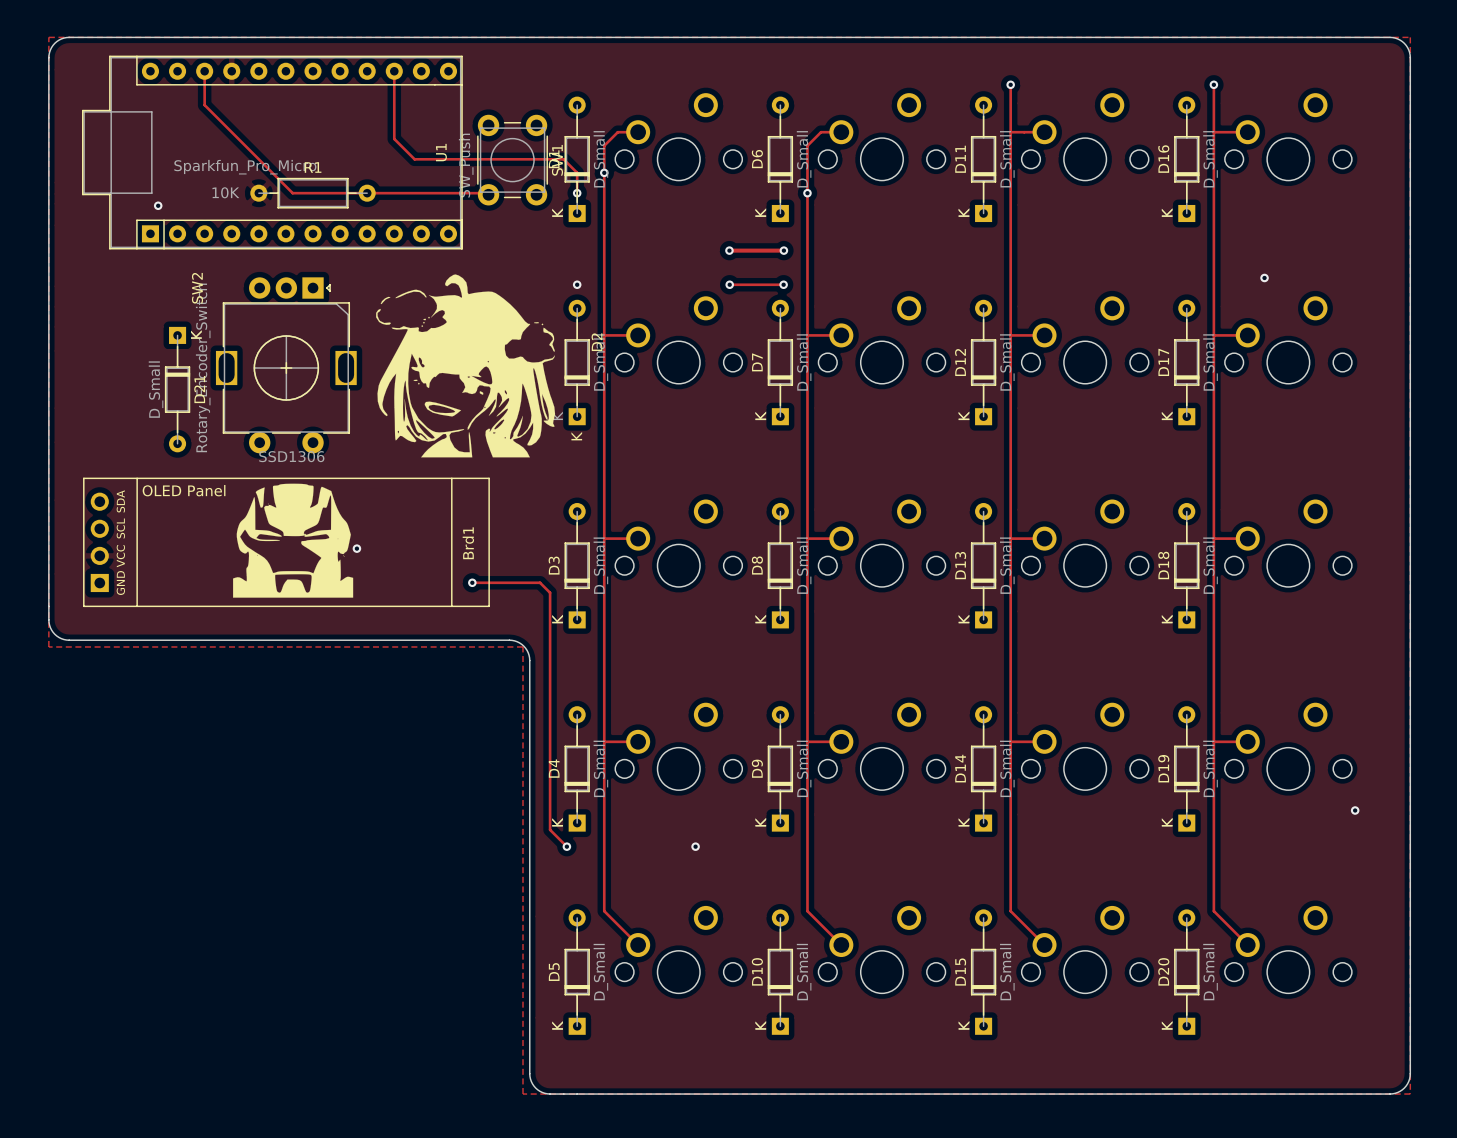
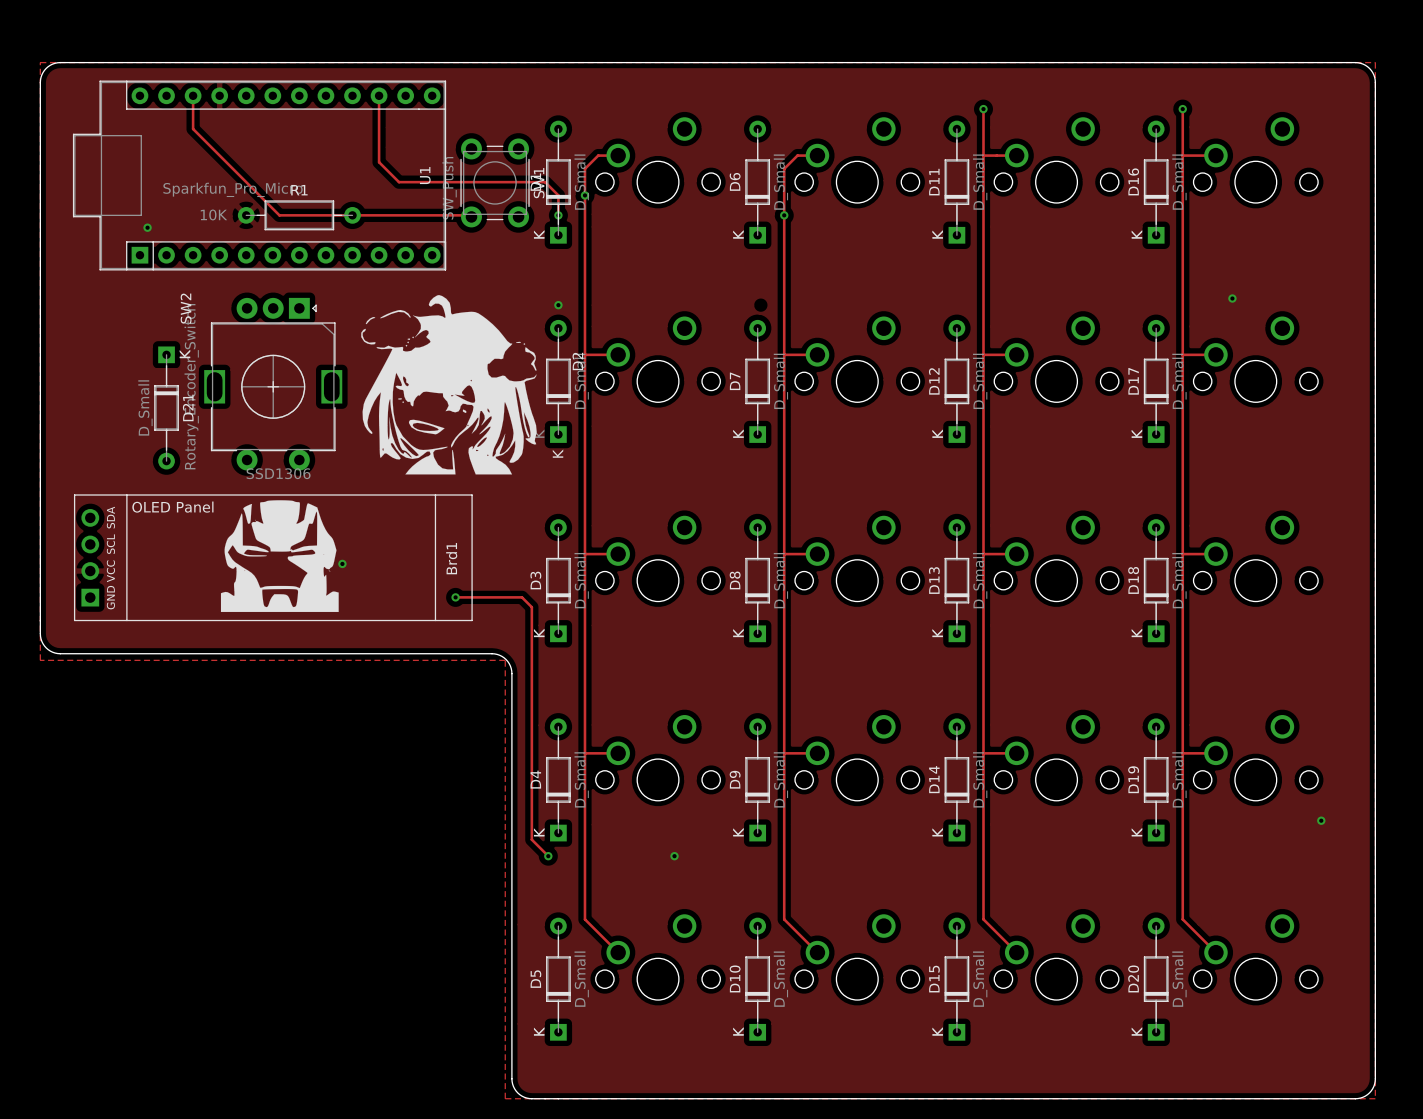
track: (729, 250) (783, 250) -> none
via: (729, 250) -> none
via: (783, 250) -> none
track: (729, 284) (783, 284) -> none
via: (729, 284) -> none
via: (783, 284) -> none

